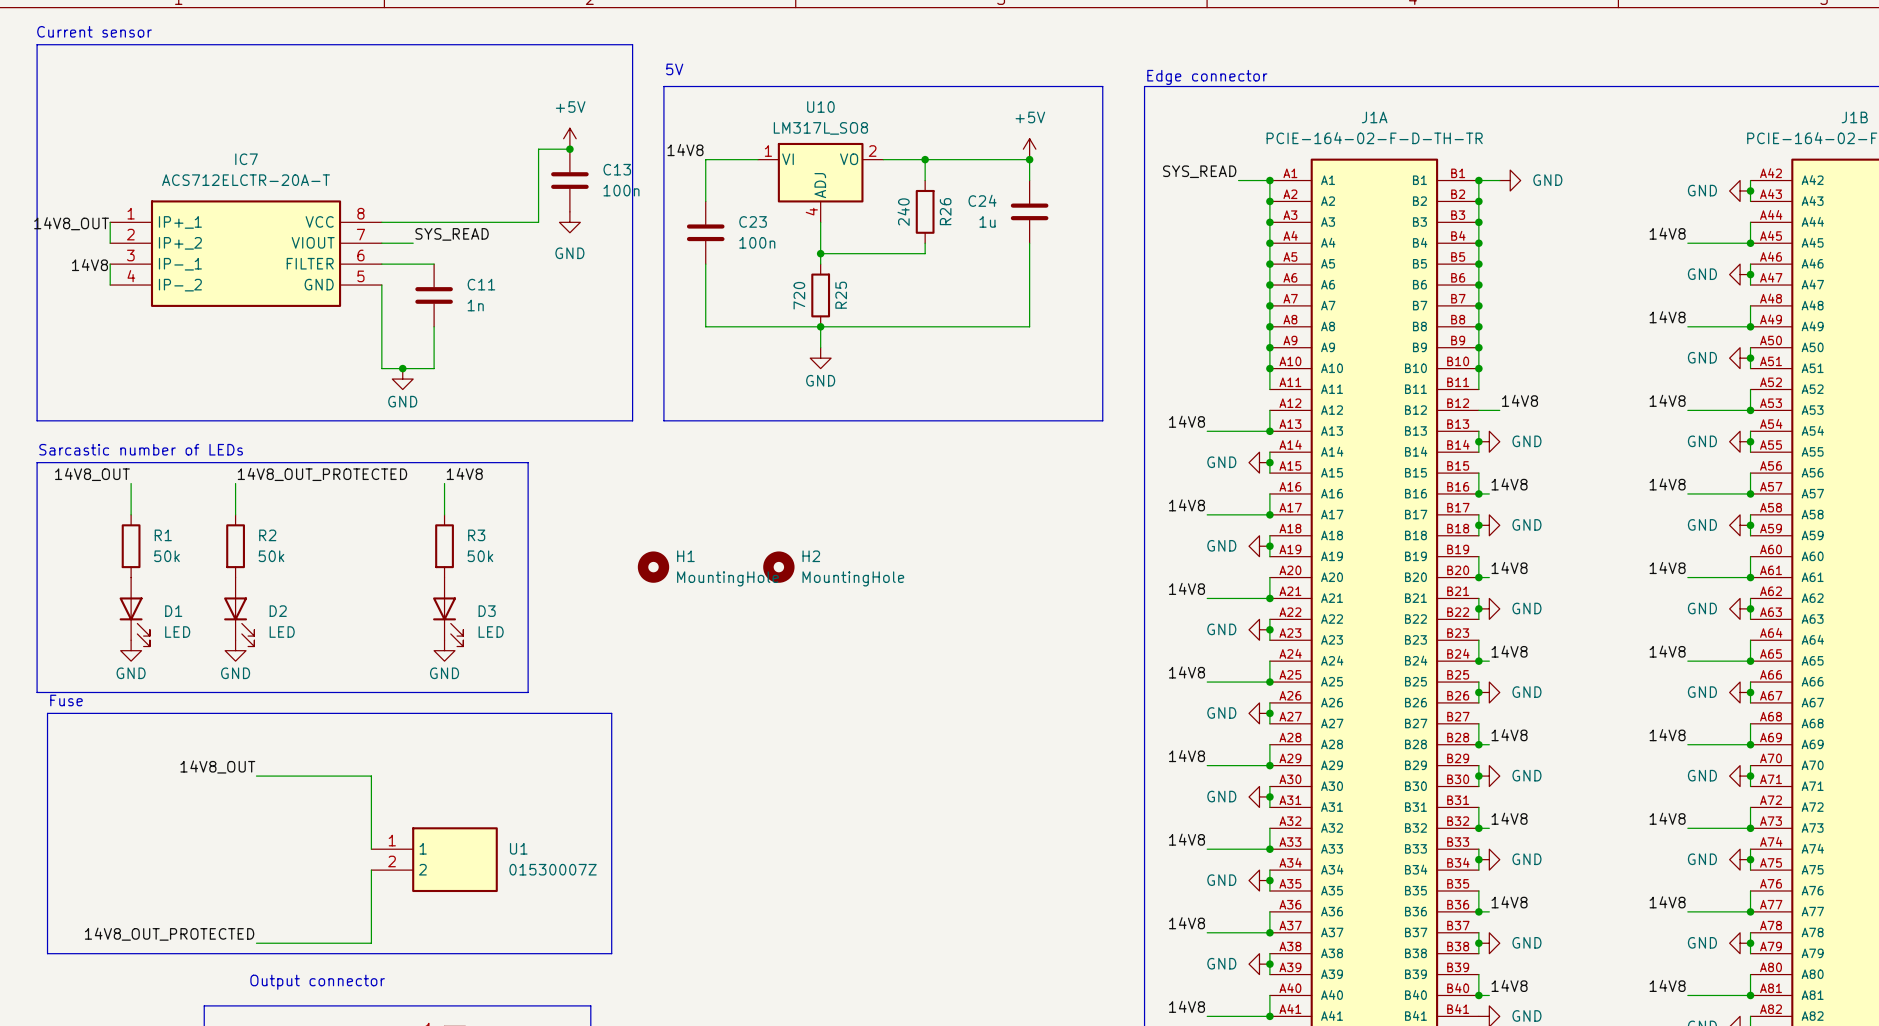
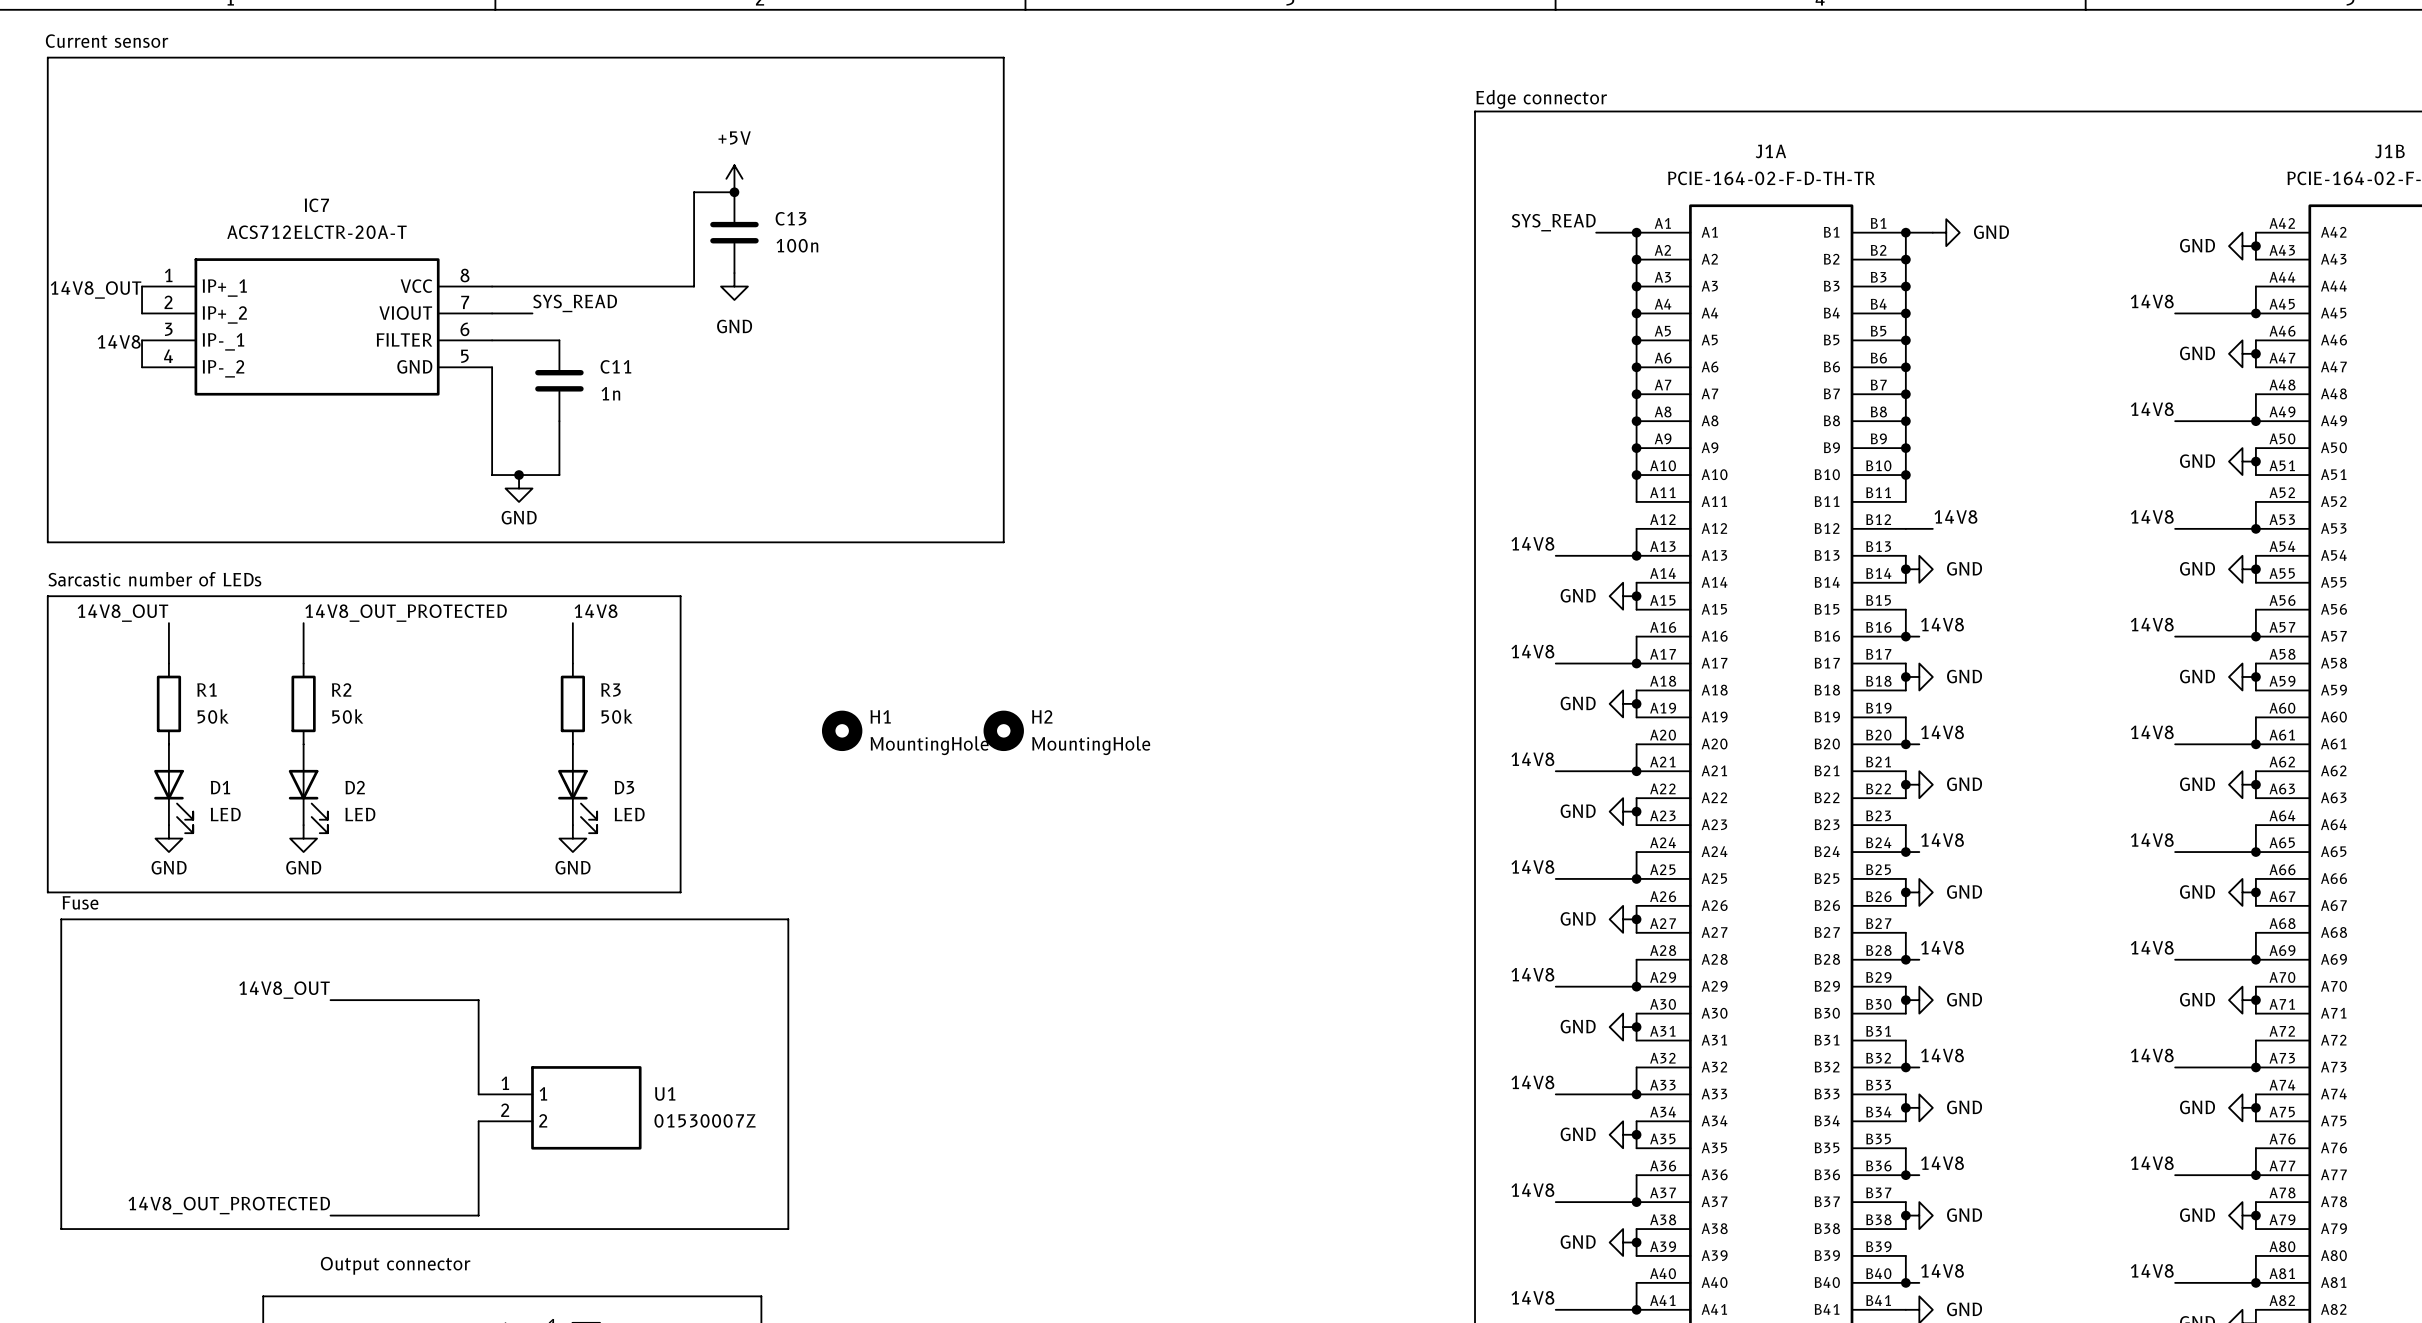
line: (632, 44) (632, 420) -> (815, 57) (1003, 57) (1003, 542)
text: 5V (674, 69) -> none
power symbol: +5V (1029, 149) -> none
label: 14V8 (685, 150) -> none
wire: (757, 159) (705, 159) (705, 201) -> none
wire: (883, 159) (1029, 159) (1029, 180) -> none
wire: (925, 159) (925, 180) -> none
junction: (925, 159) -> none
junction: (1029, 159) -> none
U10: LM317L_SO8 (820, 182) -> none
R26: 240 (925, 211) -> none
C24: 1u (1029, 211) -> none
wire: (820, 222) (820, 264) -> none
C23: 100n (705, 232) -> none
wire: (925, 243) (925, 253) (820, 253) -> none
wire: (1029, 243) (1029, 326) (705, 326) (705, 264) -> none
junction: (820, 253) -> none
R25: 720 (820, 295) -> none
wire: (820, 326) (820, 347) -> none
junction: (820, 326) -> none
power symbol: GND (820, 358) -> none
line: (663, 420) (663, 86) (1102, 86) (1102, 420) (778, 420) -> (855, 542) (815, 542)

